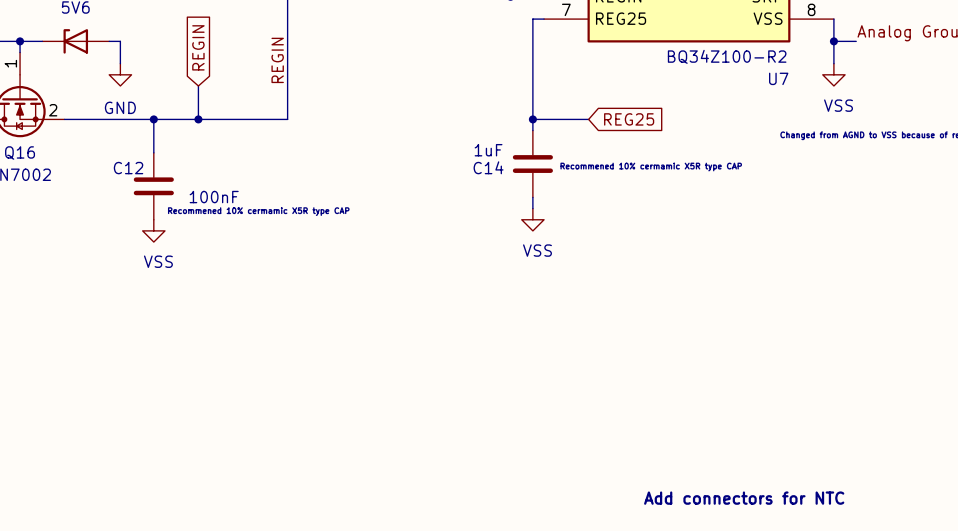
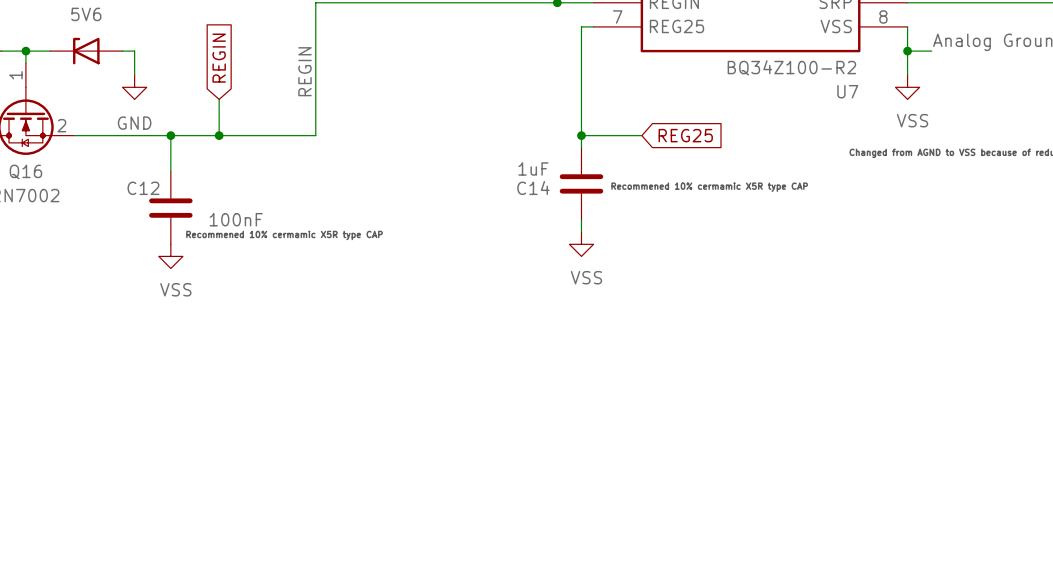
text: Add connectors for NTC (744, 498) -> none

